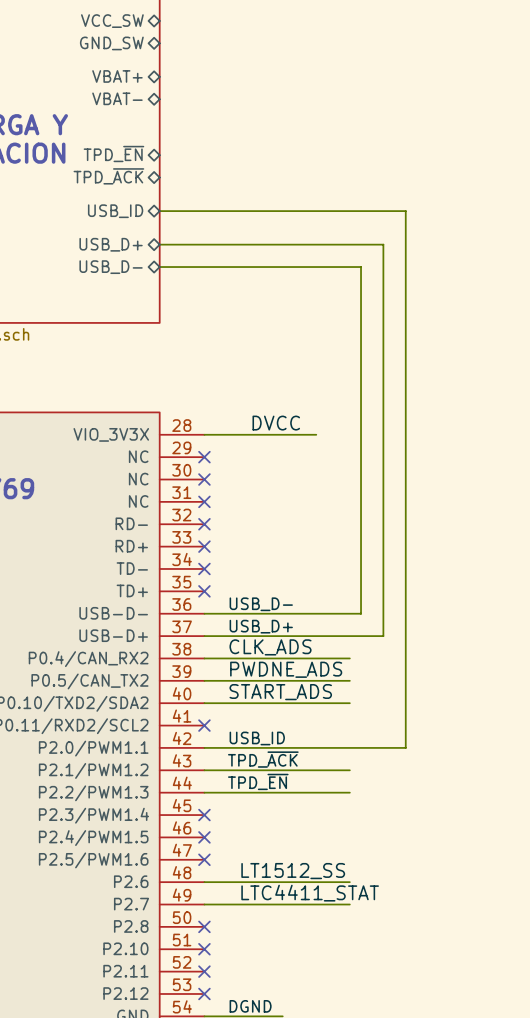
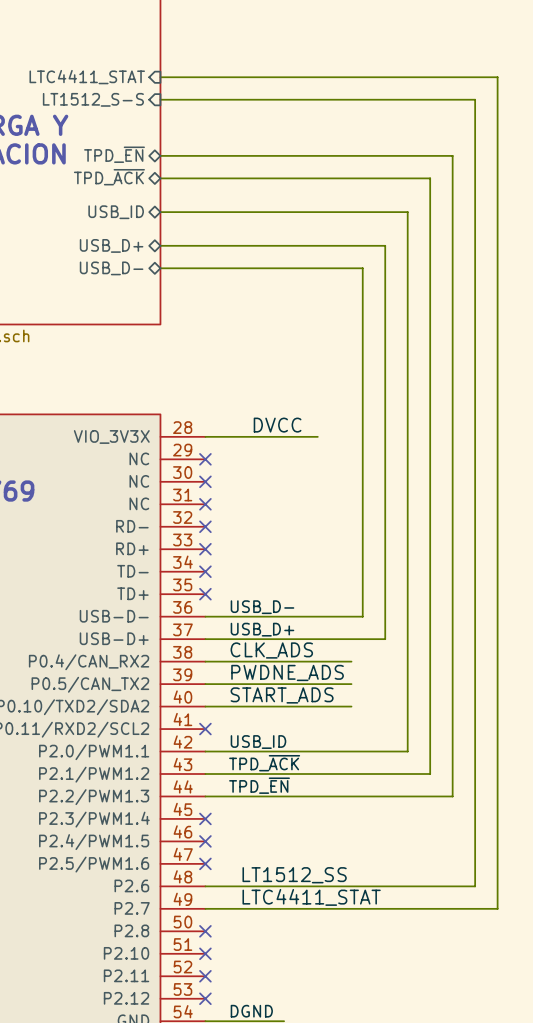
sheet pin: VCC_SW (112, 21) -> none
sheet pin: GND_SW (111, 43) -> none
sheet pin shape: bidirectional (117, 76) -> input (87, 77)
sheet pin: VBAT+ (117, 76) -> LTC4411_STAT (87, 77)
wire: none -> (160, 77) (497, 77) (497, 908) (351, 908)
sheet pin shape: bidirectional (117, 98) -> input (93, 99)
sheet pin: VBAT- (117, 98) -> LT1512_S-S (93, 99)
wire: none -> (160, 99) (475, 99) (475, 886) (351, 886)
wire: none -> (160, 155) (452, 155) (452, 796) (351, 796)
wire: none -> (160, 178) (430, 178) (430, 774) (351, 774)

